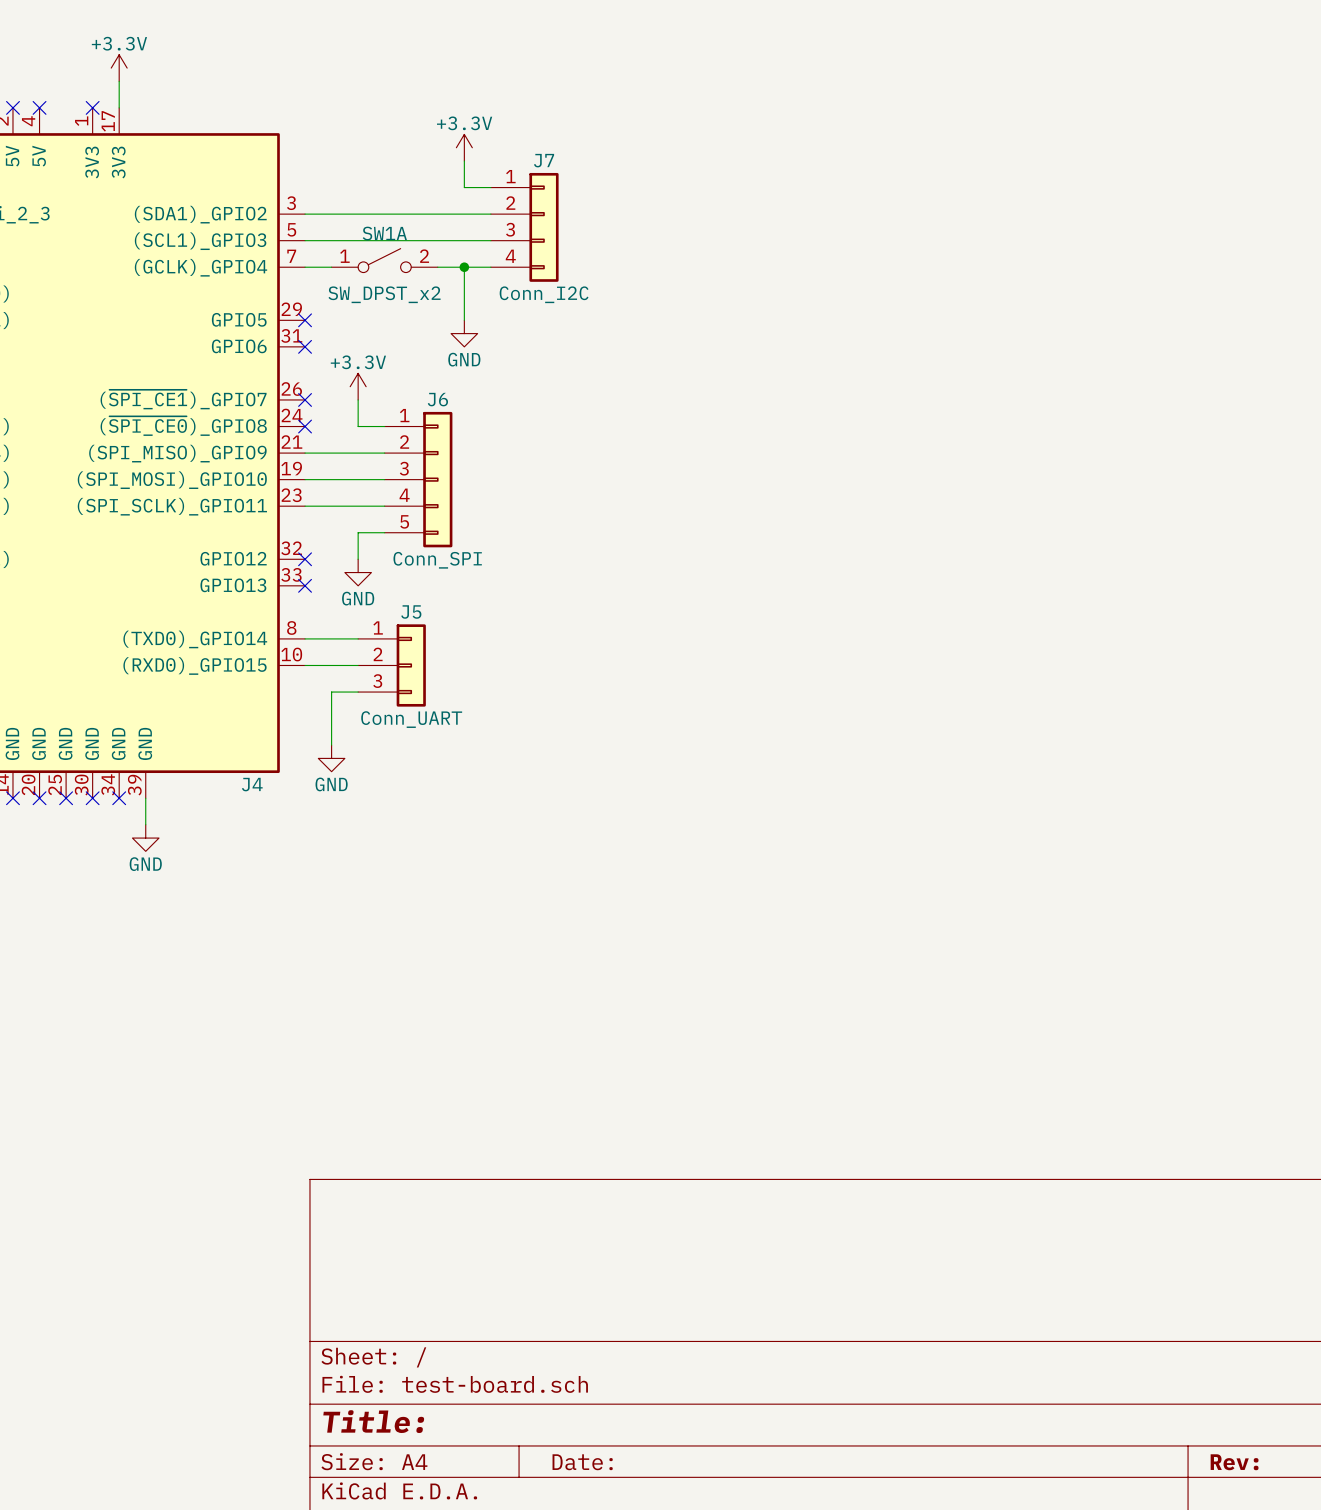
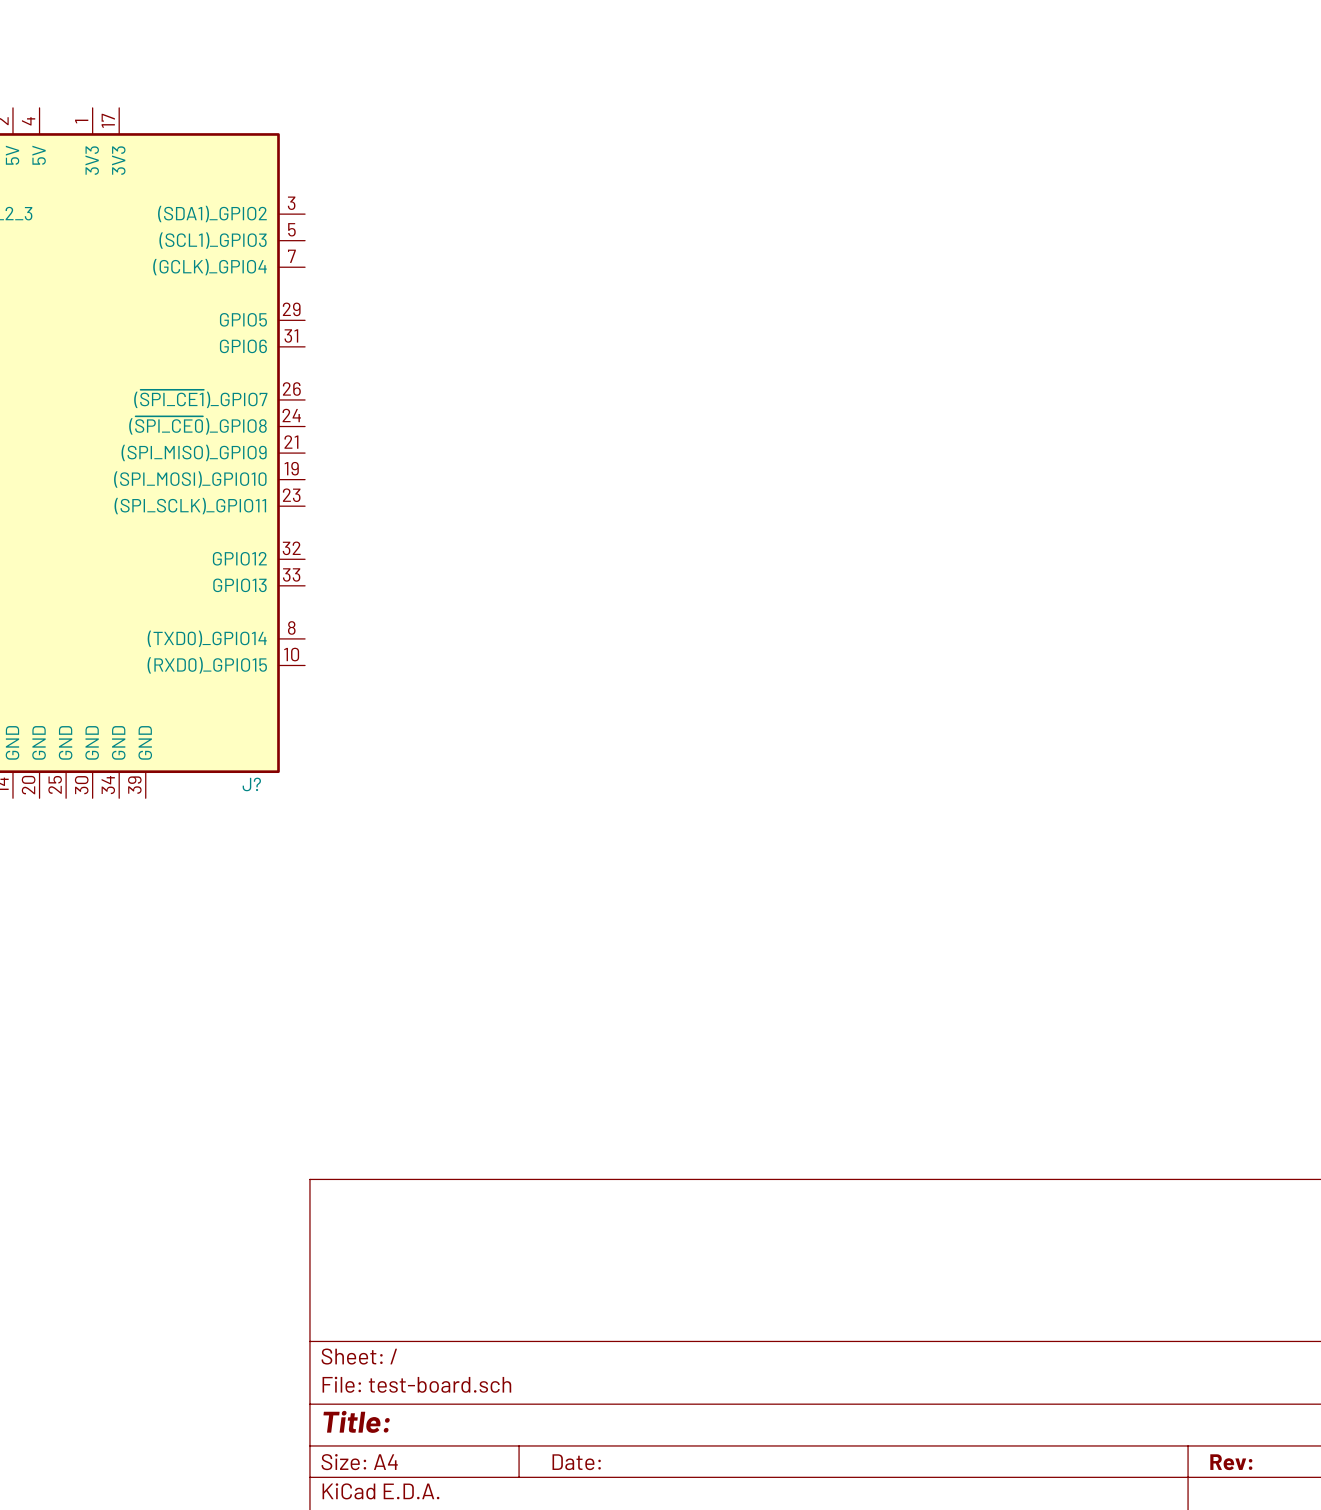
power symbol: +3.3V (119, 68) -> none
wire: (119, 81) (119, 107) -> none
no-connect mark: (12, 107) -> none
no-connect mark: (39, 107) -> none
no-connect mark: (92, 107) -> none
power symbol: +3.3V (464, 147) -> none
wire: (464, 161) (464, 187) (490, 187) -> none
wire: (305, 214) (490, 214) -> none
J7: Conn_I2C (524, 227) -> none
wire: (305, 240) (490, 240) -> none
SW1A: SW_DPST_x2 (384, 260) -> none
wire: (305, 267) (331, 267) -> none
wire: (437, 267) (490, 267) -> none
wire: (464, 267) (464, 320) -> none
junction: (464, 267) -> none
no-connect mark: (305, 320) -> none
power symbol: GND (464, 333) -> none
no-connect mark: (305, 346) -> none
power symbol: +3.3V (358, 386) -> none
no-connect mark: (305, 399) -> none
wire: (358, 399) (358, 426) (384, 426) -> none
no-connect mark: (305, 426) -> none
wire: (305, 453) (384, 453) -> none
wire: (305, 479) (384, 479) -> none
J6: Conn_SPI (418, 479) -> none
wire: (305, 506) (384, 506) -> none
wire: (384, 532) (358, 532) (358, 559) -> none
no-connect mark: (305, 559) -> none
power symbol: GND (358, 572) -> none
no-connect mark: (305, 585) -> none
wire: (305, 638) (358, 638) -> none
wire: (305, 665) (358, 665) -> none
J5: Conn_UART (392, 665) -> none
wire: (358, 692) (331, 692) (331, 745) -> none
power symbol: GND (331, 758) -> none
J4 name: J4 (252, 784) -> J? (251, 784)
no-connect mark: (12, 798) -> none
no-connect mark: (39, 798) -> none
no-connect mark: (66, 798) -> none
no-connect mark: (92, 798) -> none
no-connect mark: (119, 798) -> none
wire: (145, 798) (145, 824) -> none
power symbol: GND (145, 838) -> none

